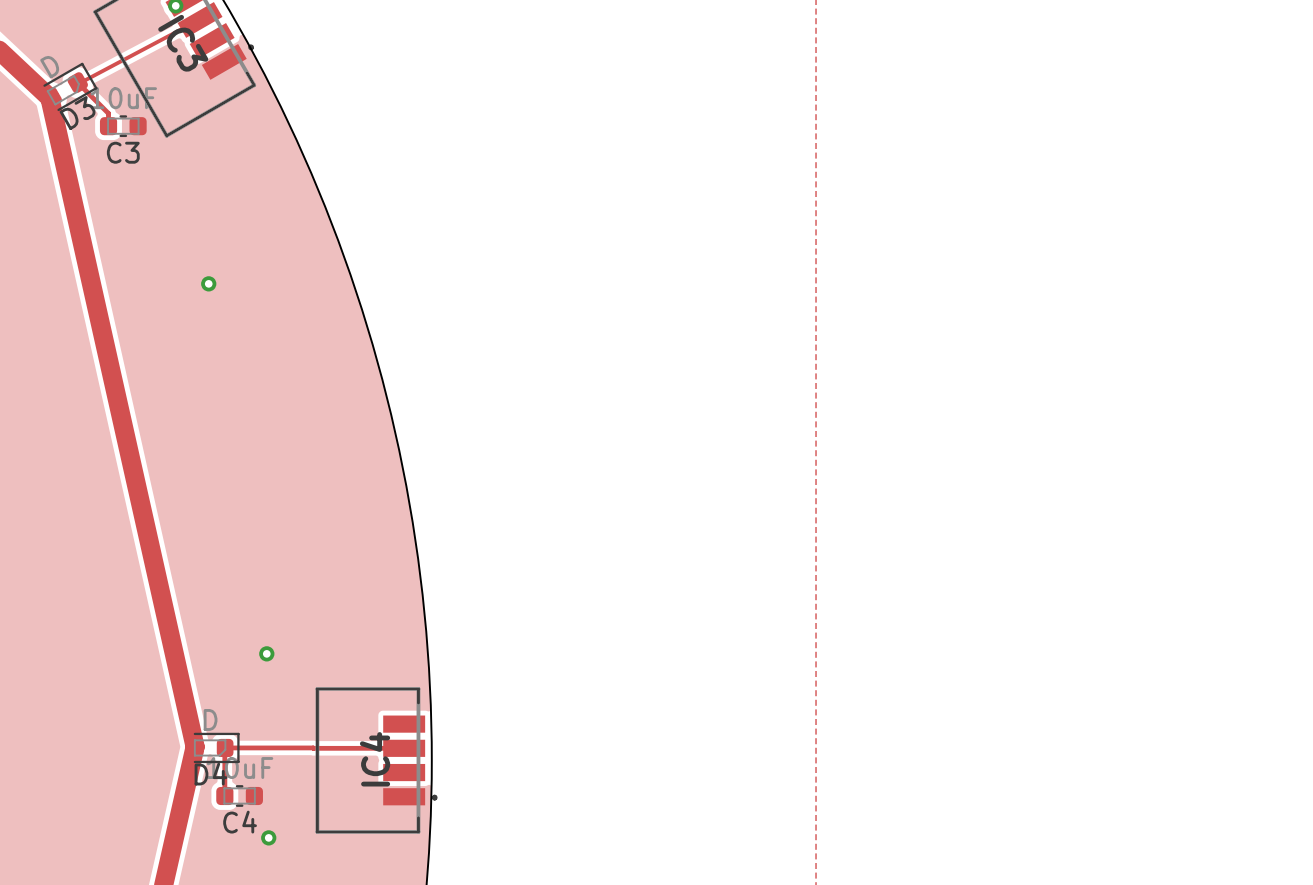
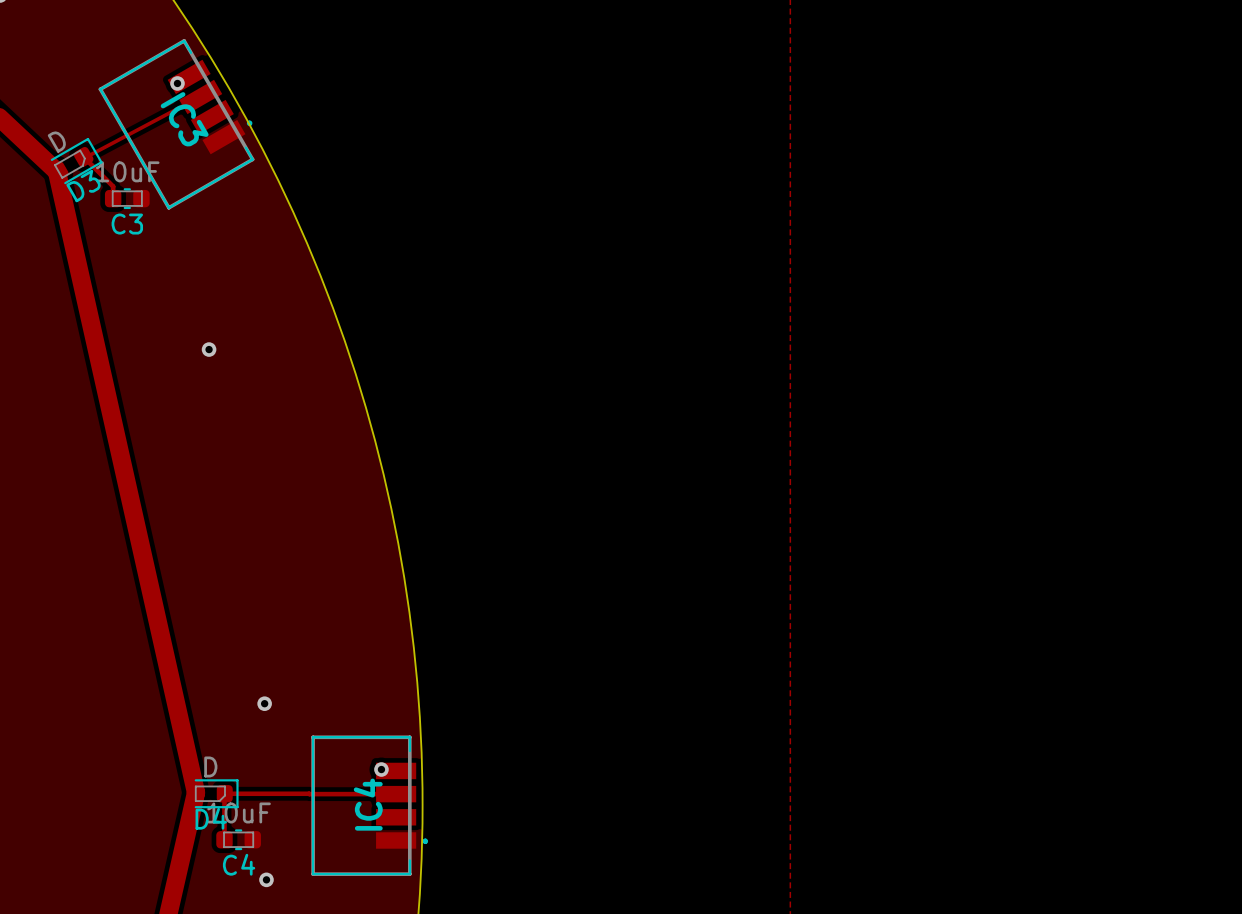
via: none -> (381, 769)

